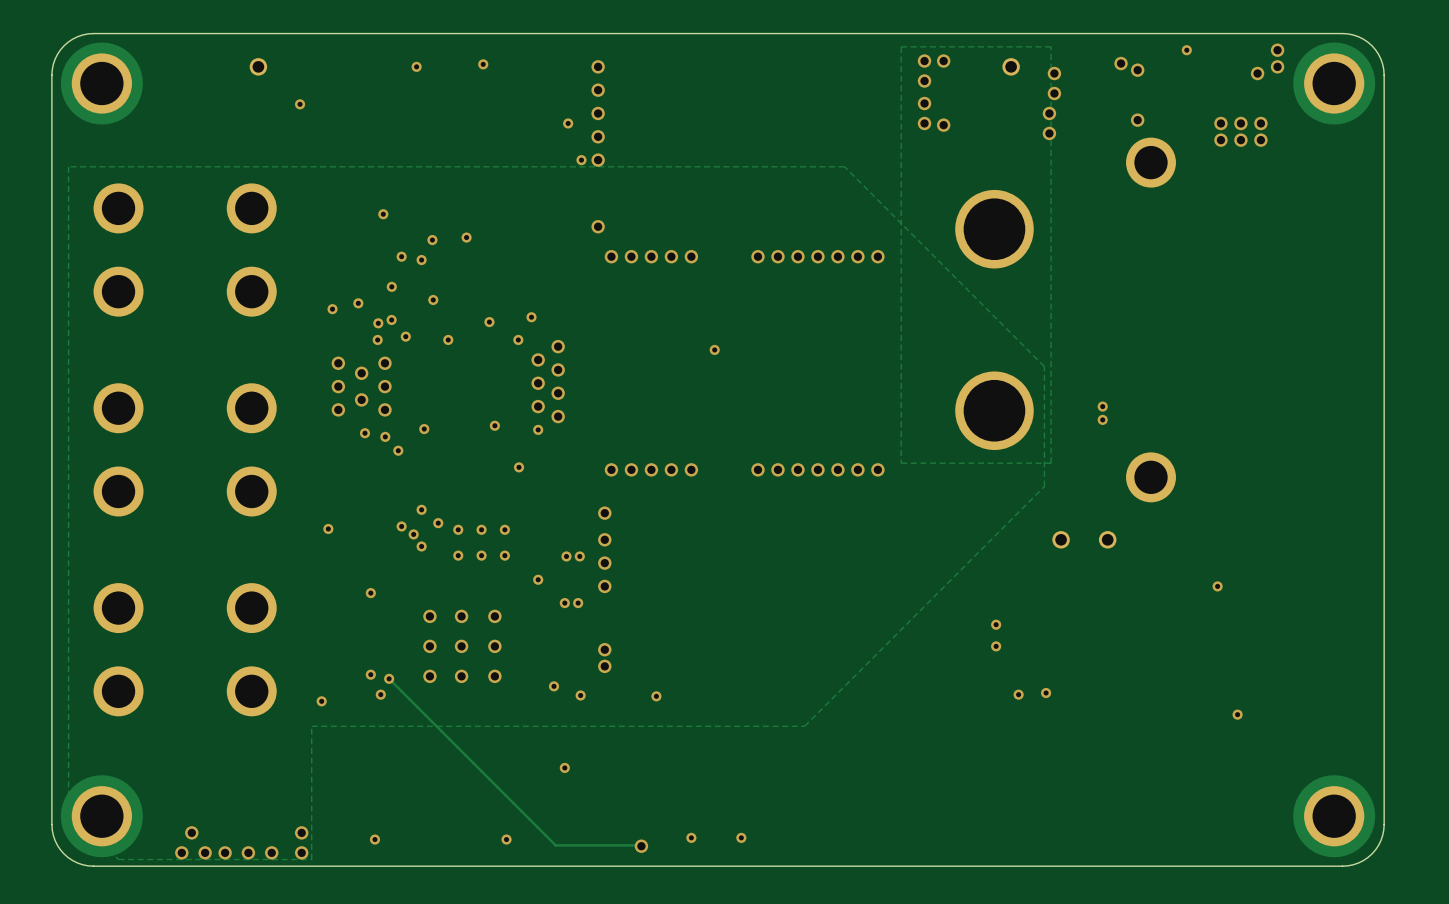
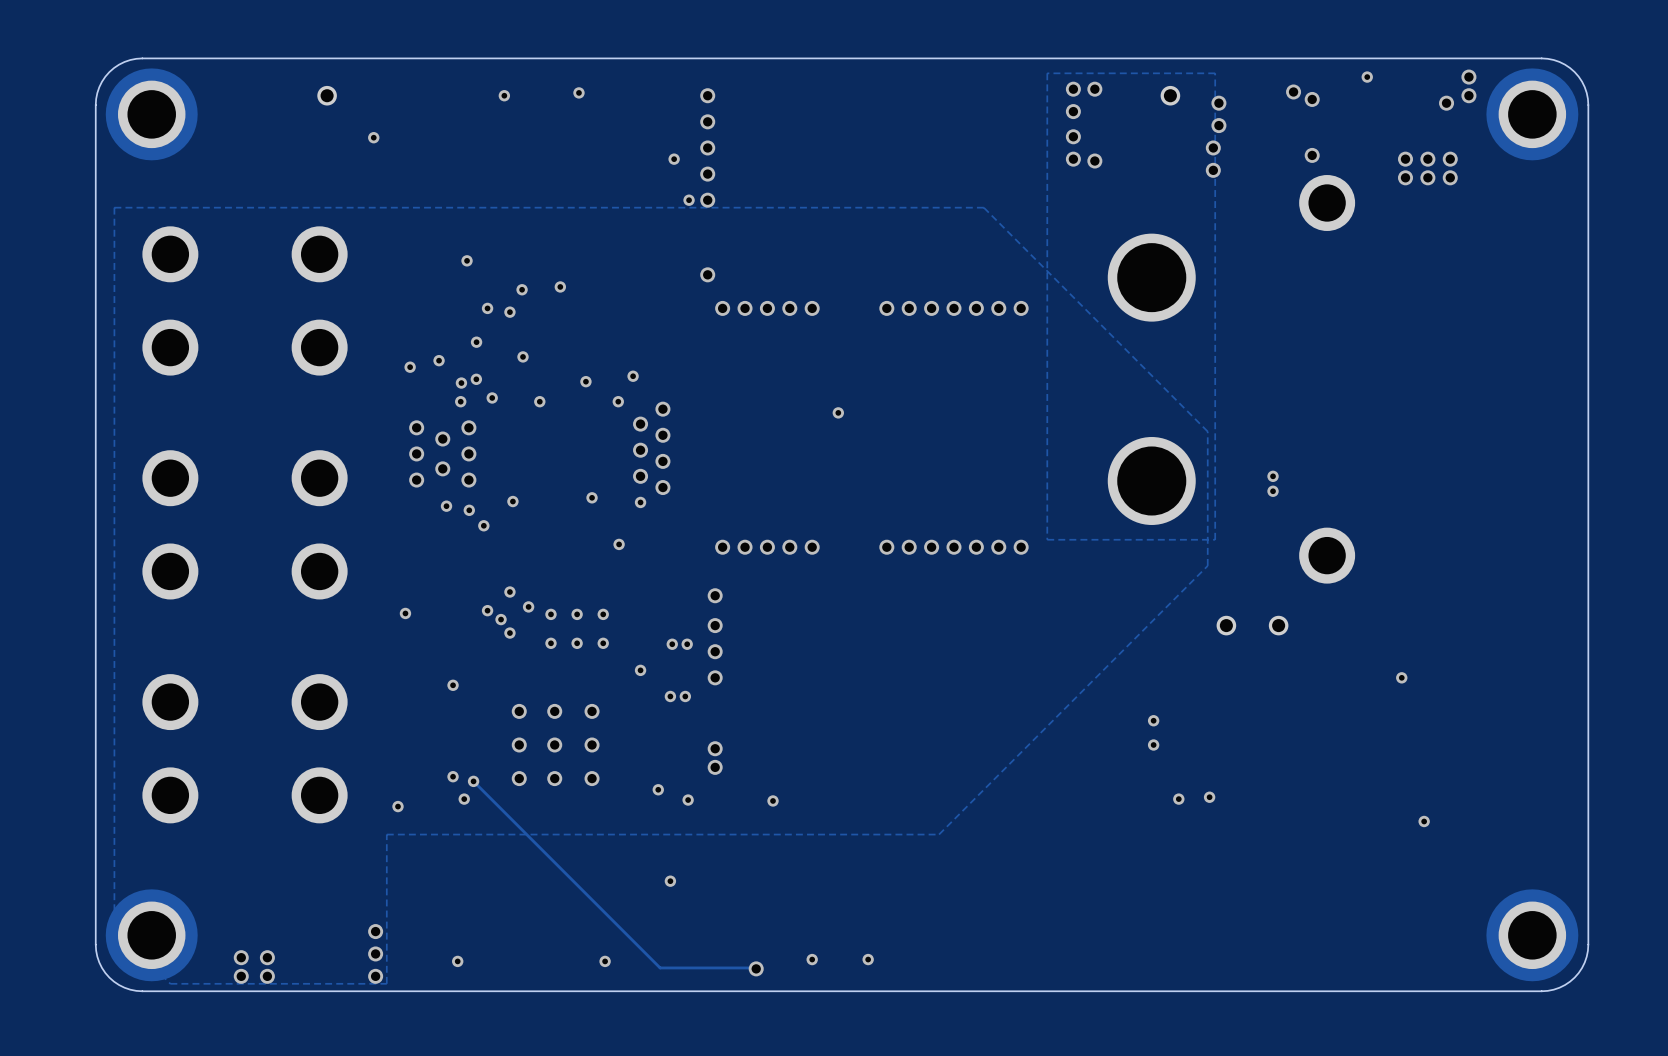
via: none -> (375, 931)
via: (191, 832) -> none
via: none -> (241, 957)
via: none -> (267, 957)
via: (225, 852) -> none
via: (248, 852) -> none
via: (271, 852) -> none

